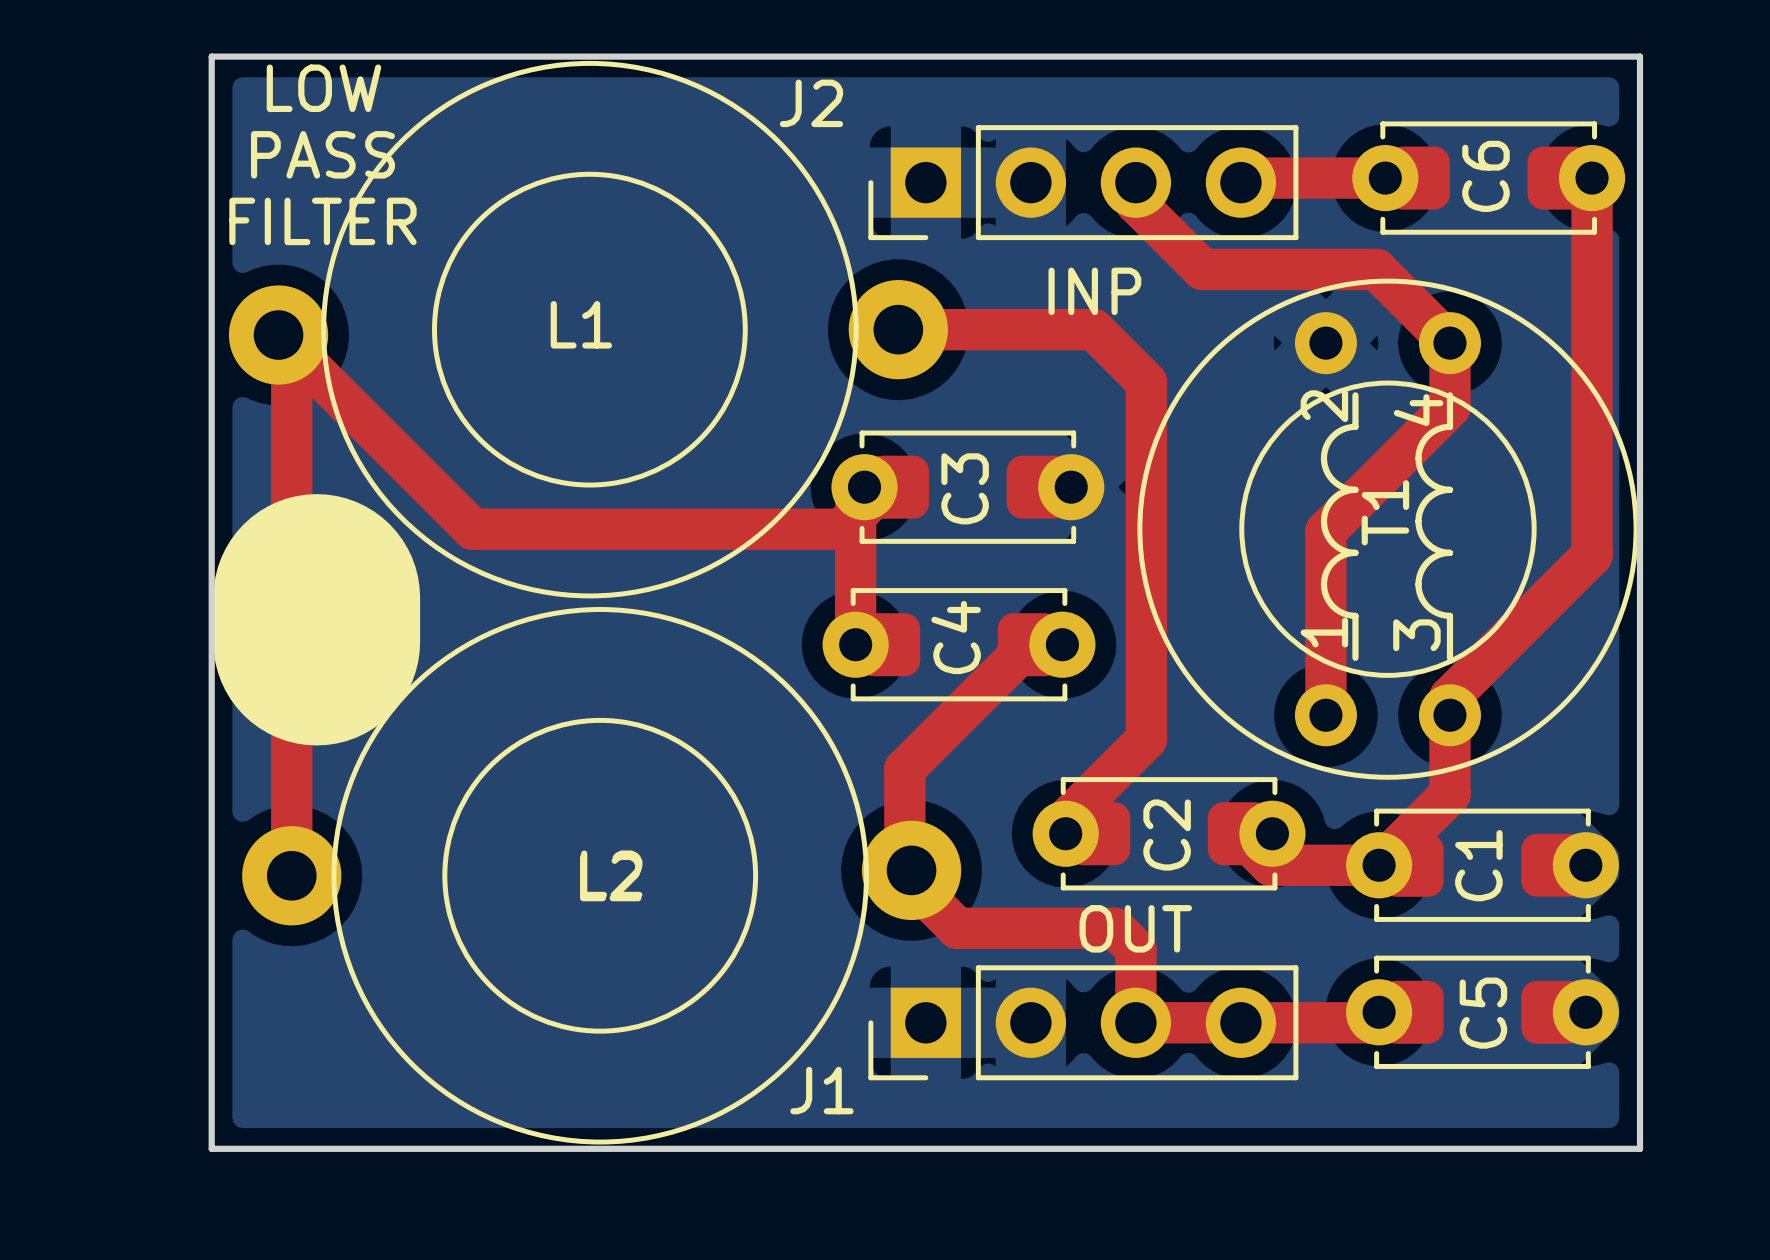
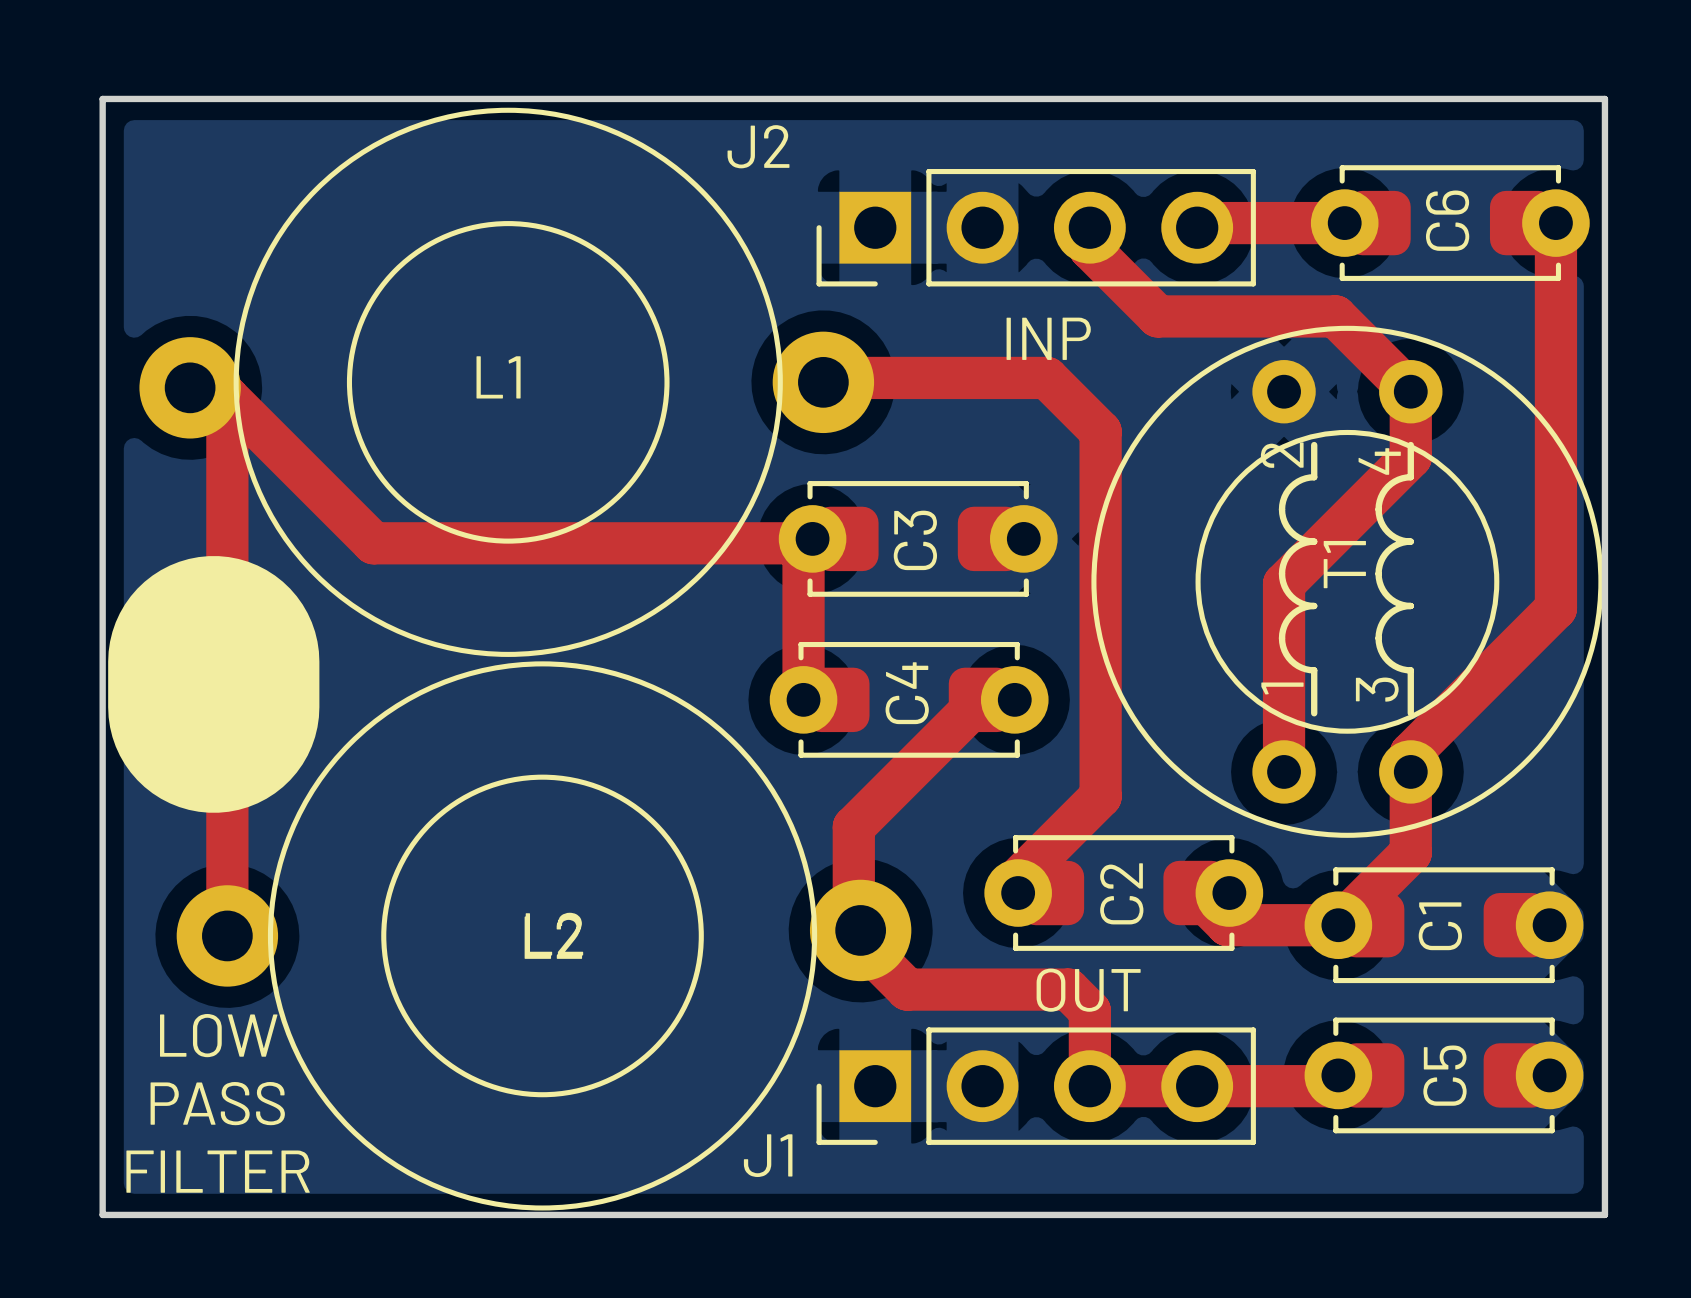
board edge: (211, 56) (211, 1148) -> (145, 98) (102, 98) (102, 1214) (145, 1214)
text position: LOW (323, 88) -> LOW (218, 1035)
text position: PASS (322, 154) -> PASS (217, 1103)
text position: FILTER (322, 221) -> FILTER (218, 1171)
L1 position: (588, 329) -> (506, 382)
top track: (864, 487) (864, 506) (841, 529) (472, 529) (434, 491) -> (808, 543) (373, 543)
line: (316, 597) (316, 642) -> (213, 661) (213, 707)

